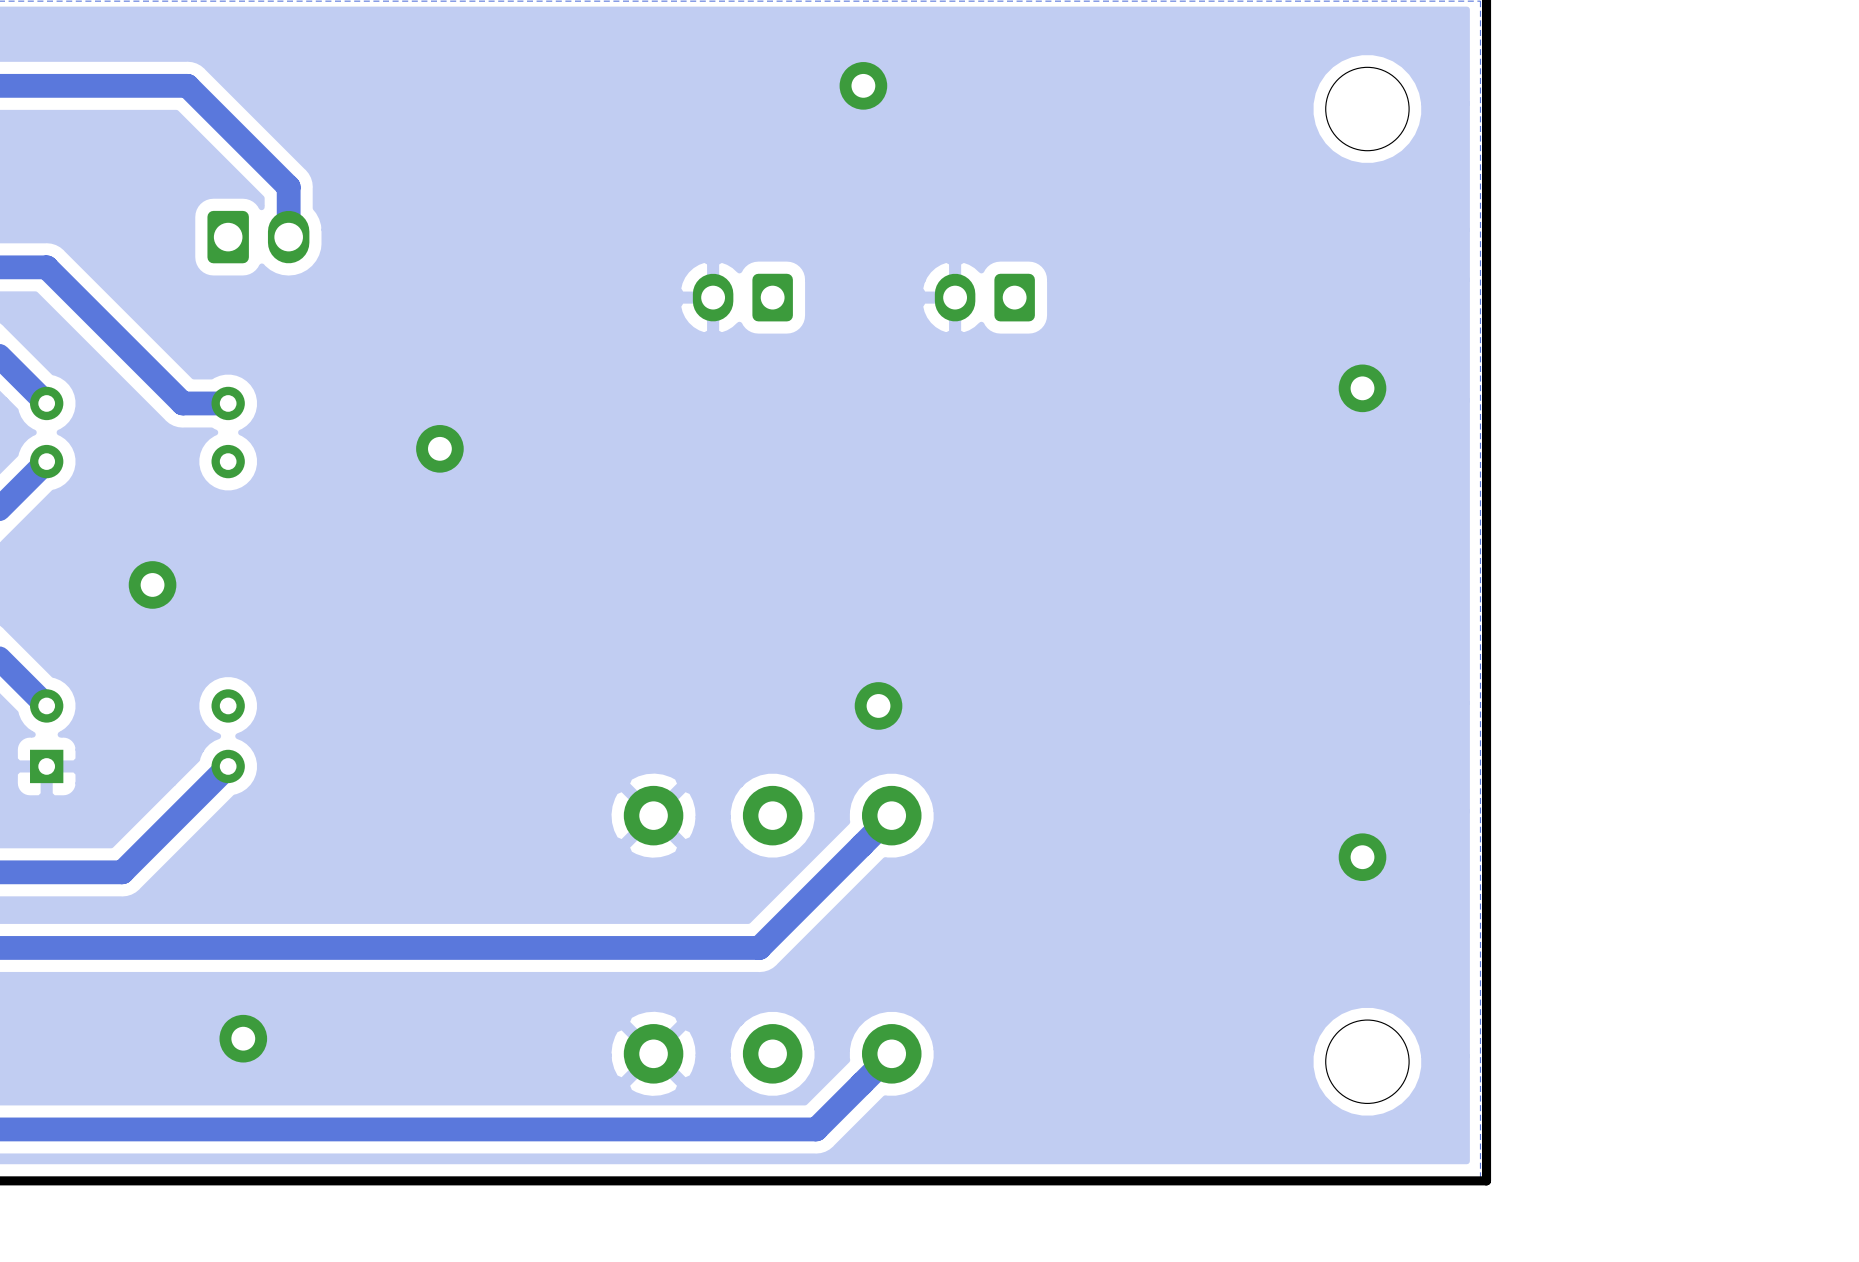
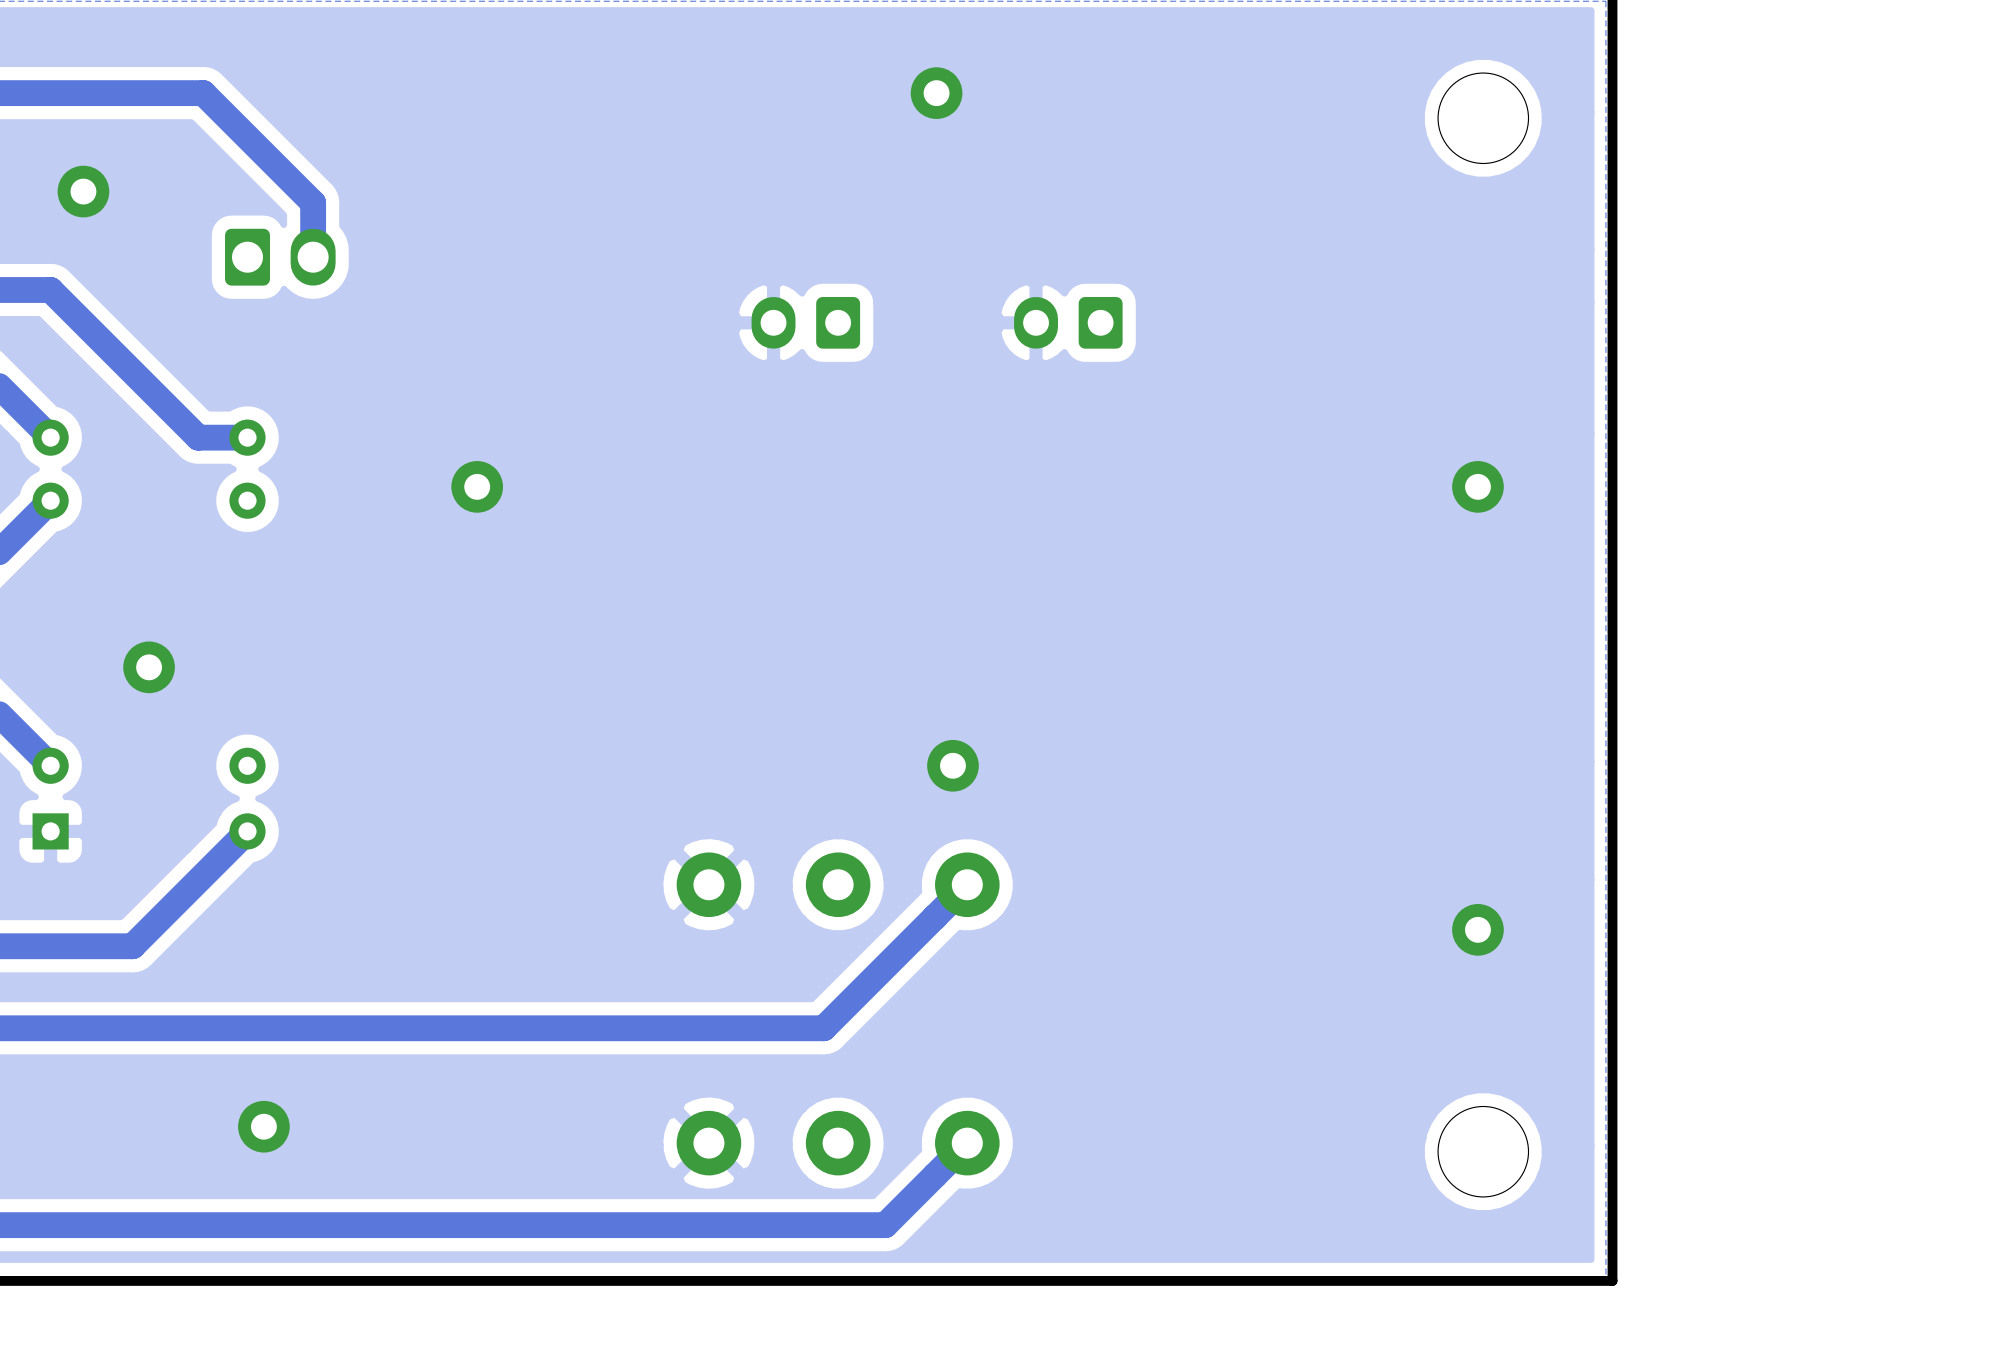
via: none -> (83, 191)
via position: (1362, 388) -> (1477, 486)
via position: (152, 584) -> (149, 667)

